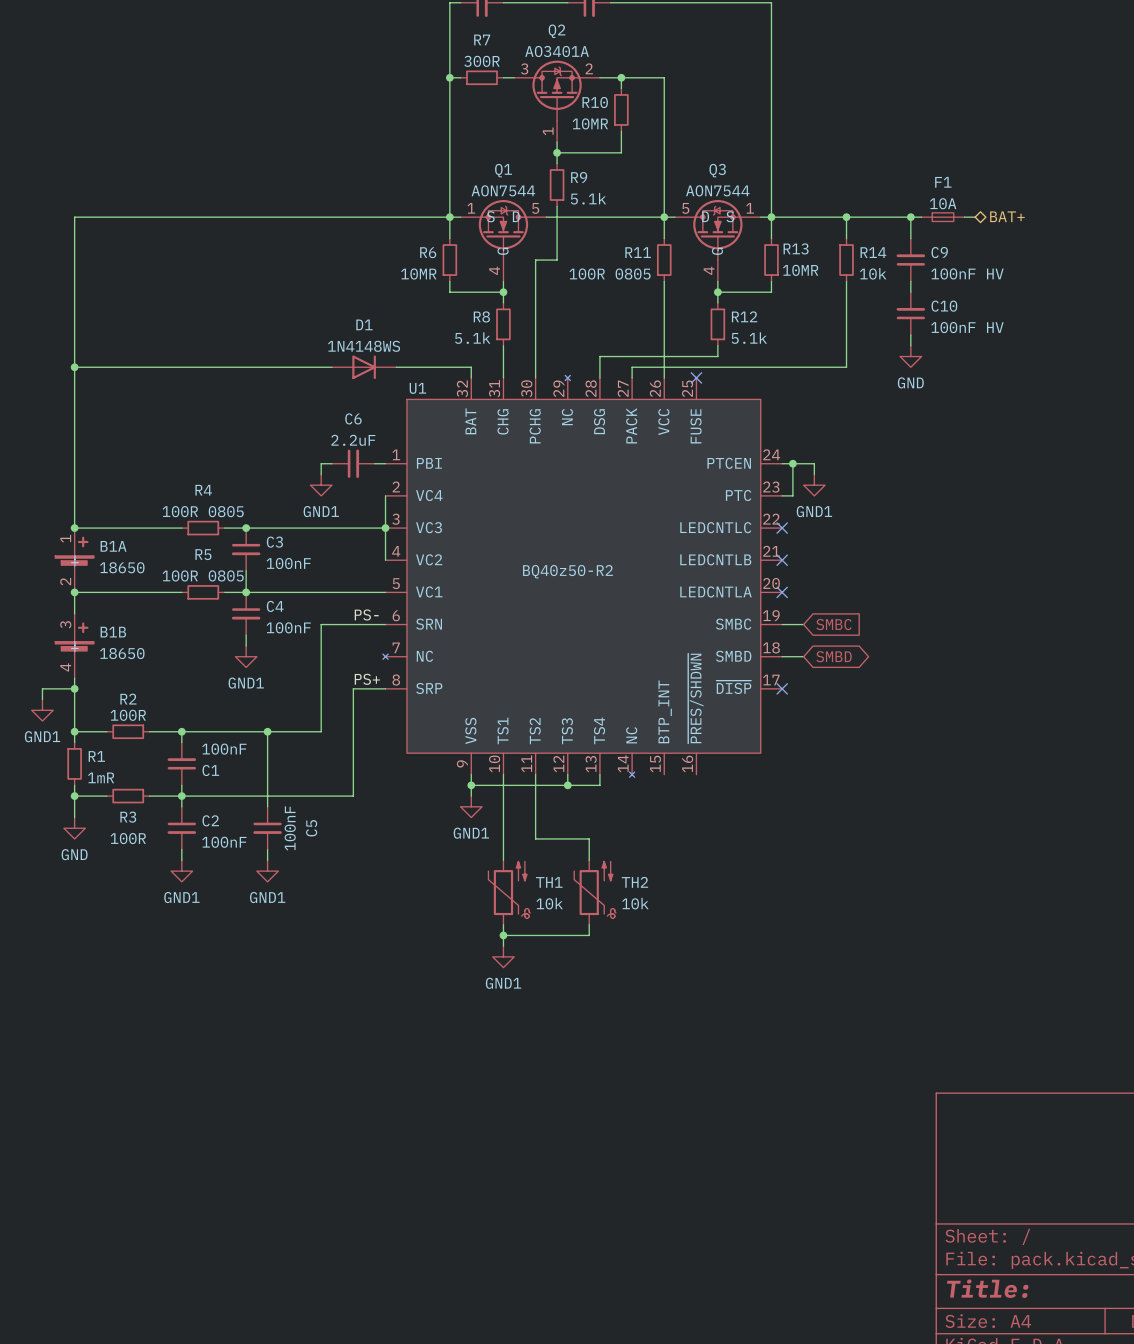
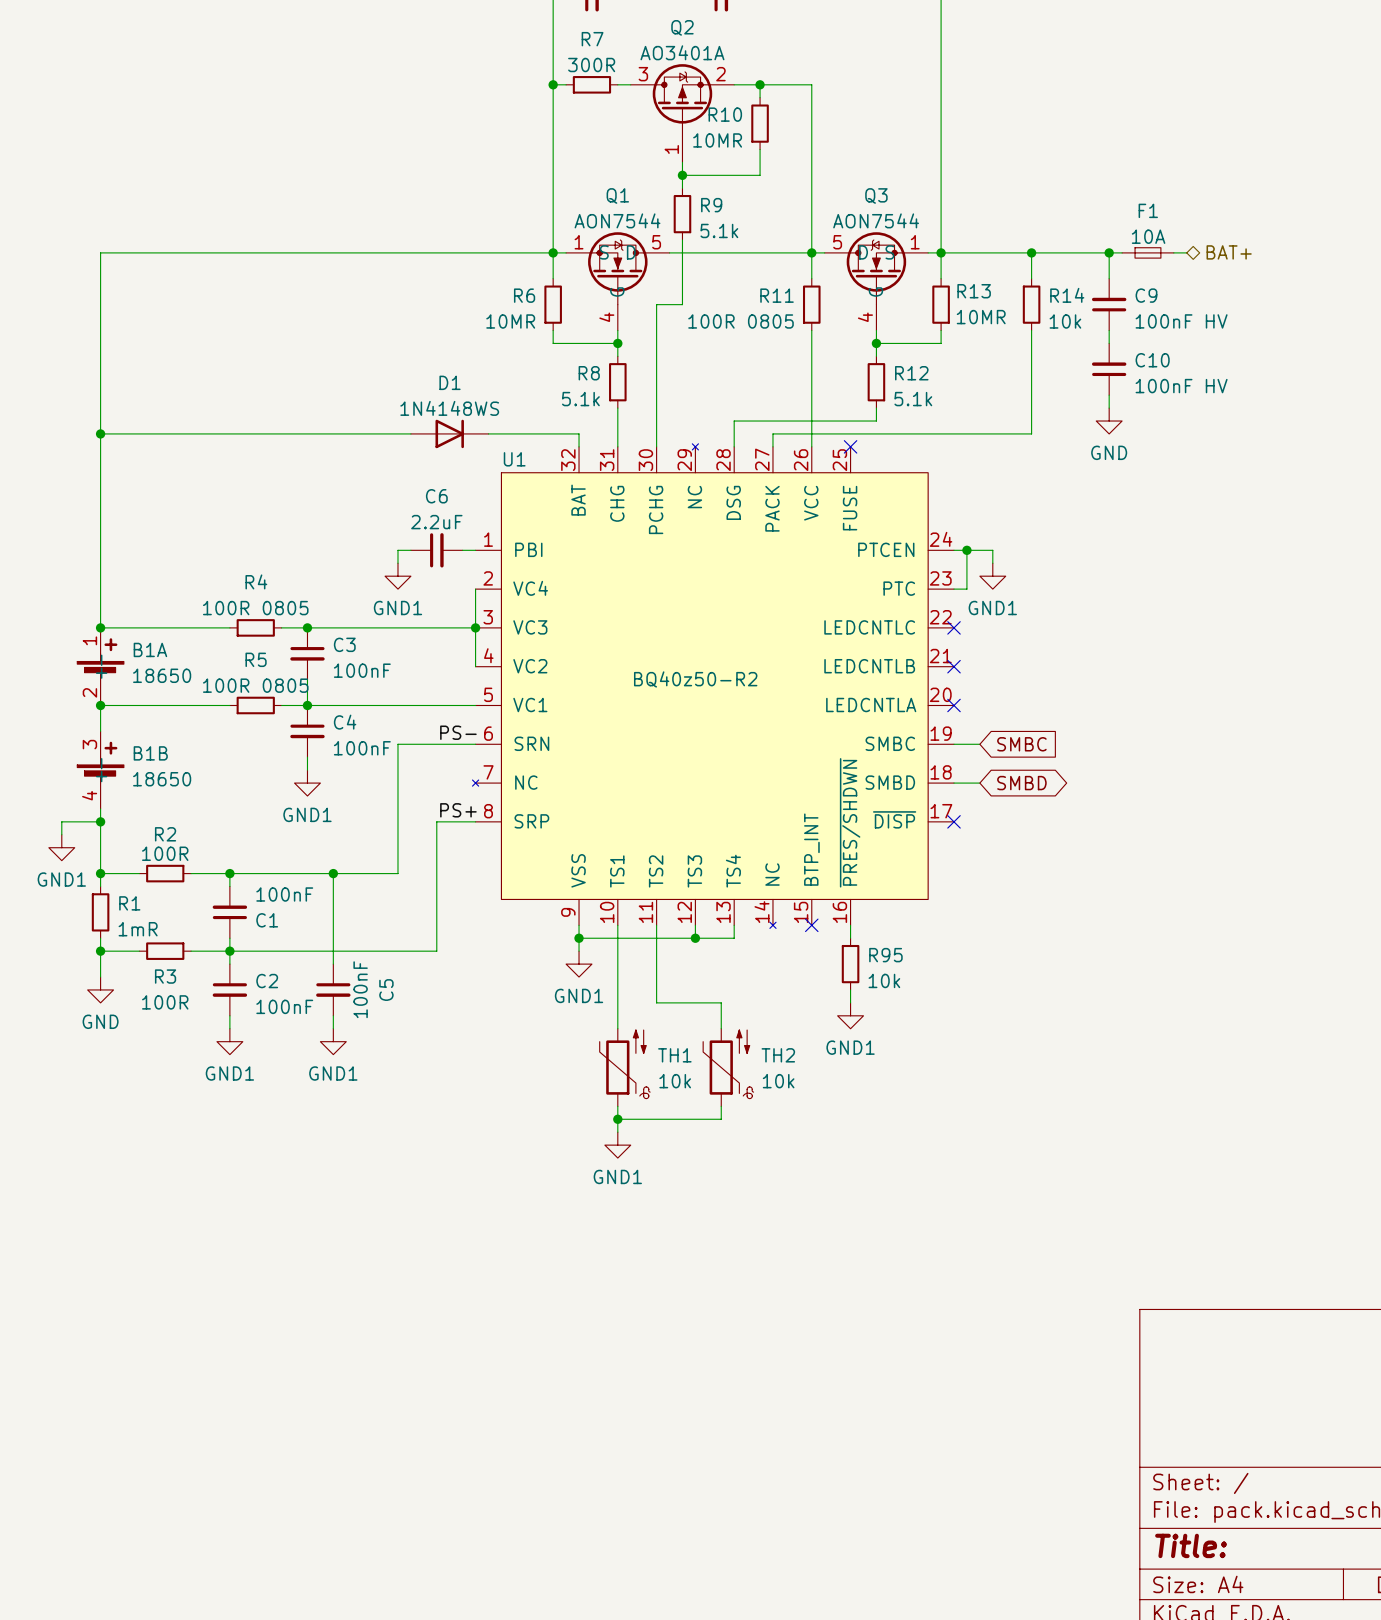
no-connect mark: none -> (811, 925)
wire: none -> (850, 925) (850, 938)
R95: none -> 10k (850, 964)
wire: none -> (850, 989) (850, 1002)
power symbol: none -> GND1 (850, 1015)

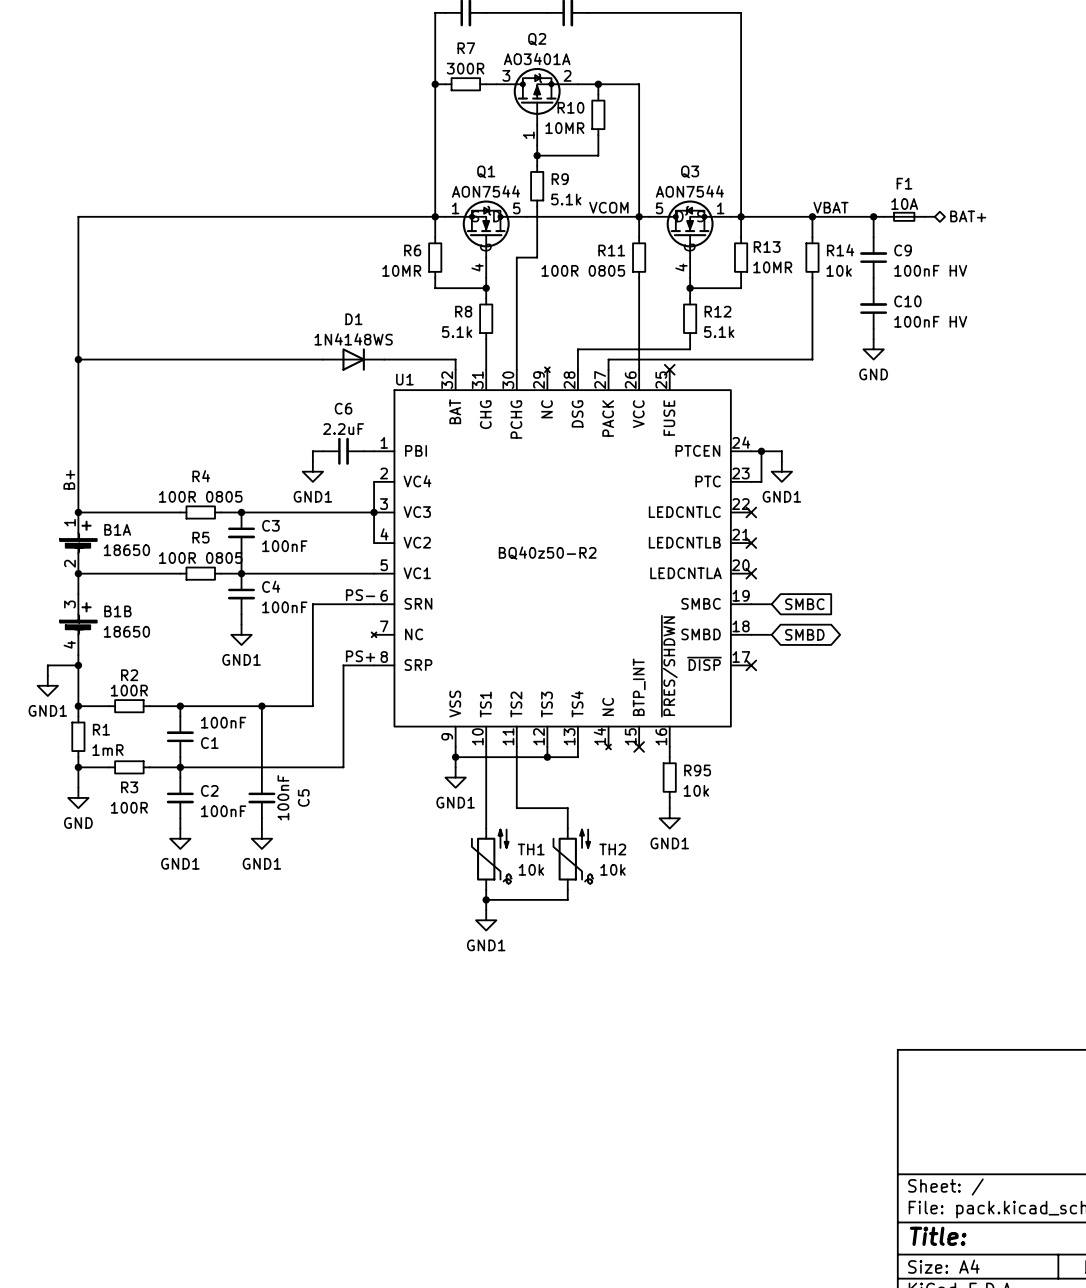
label: none -> VCOM (608, 207)
label: none -> VBAT (830, 207)
label: none -> B+ (69, 479)

